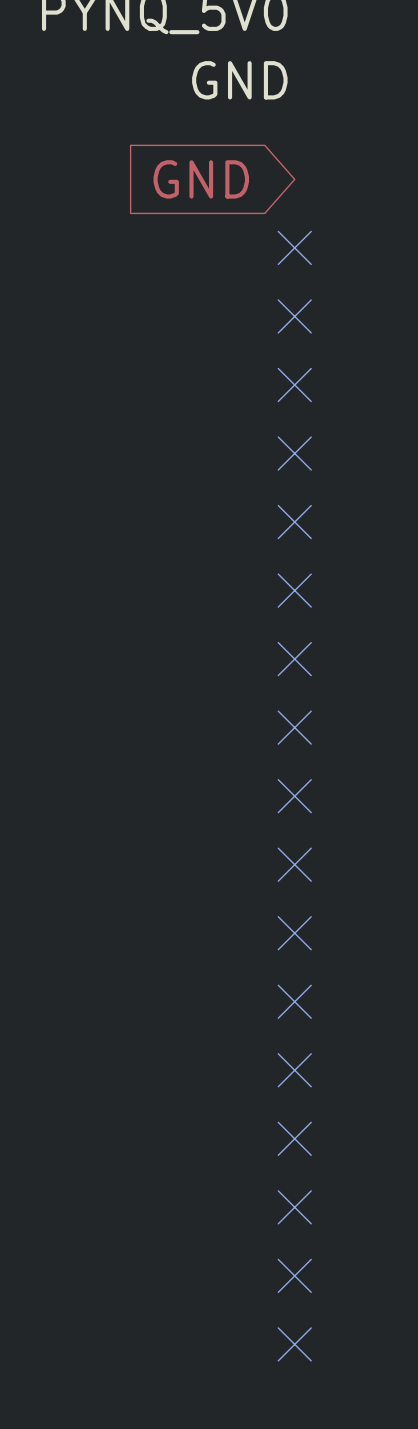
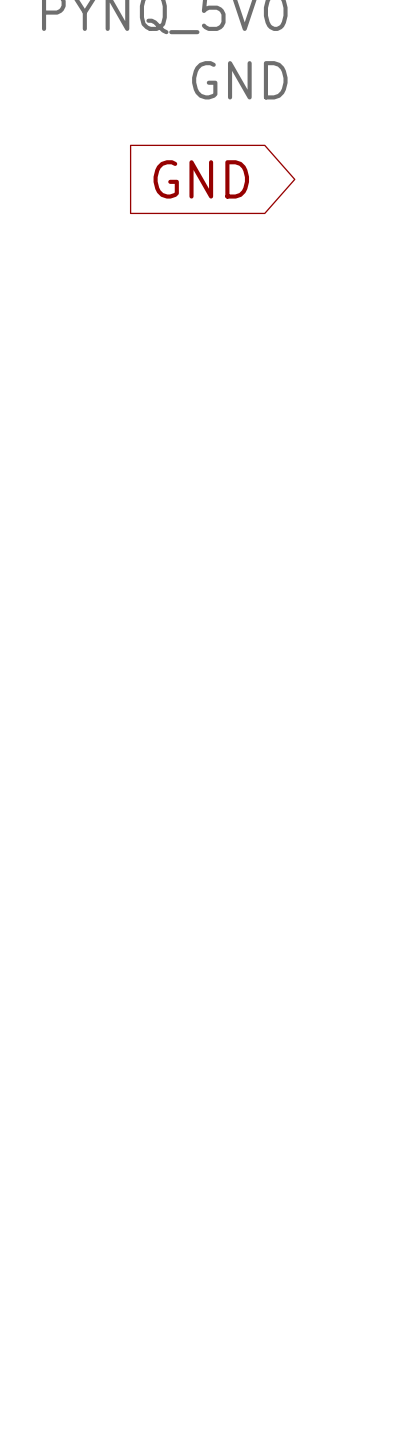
no-connect mark: (294, 247) -> none
no-connect mark: (294, 316) -> none
no-connect mark: (294, 384) -> none
no-connect mark: (294, 453) -> none
no-connect mark: (294, 522) -> none
no-connect mark: (294, 590) -> none
no-connect mark: (294, 659) -> none
no-connect mark: (294, 727) -> none
no-connect mark: (294, 796) -> none
no-connect mark: (294, 864) -> none
no-connect mark: (294, 933) -> none
no-connect mark: (294, 1001) -> none
no-connect mark: (294, 1070) -> none
no-connect mark: (294, 1138) -> none
no-connect mark: (294, 1207) -> none
no-connect mark: (294, 1275) -> none
no-connect mark: (294, 1344) -> none

